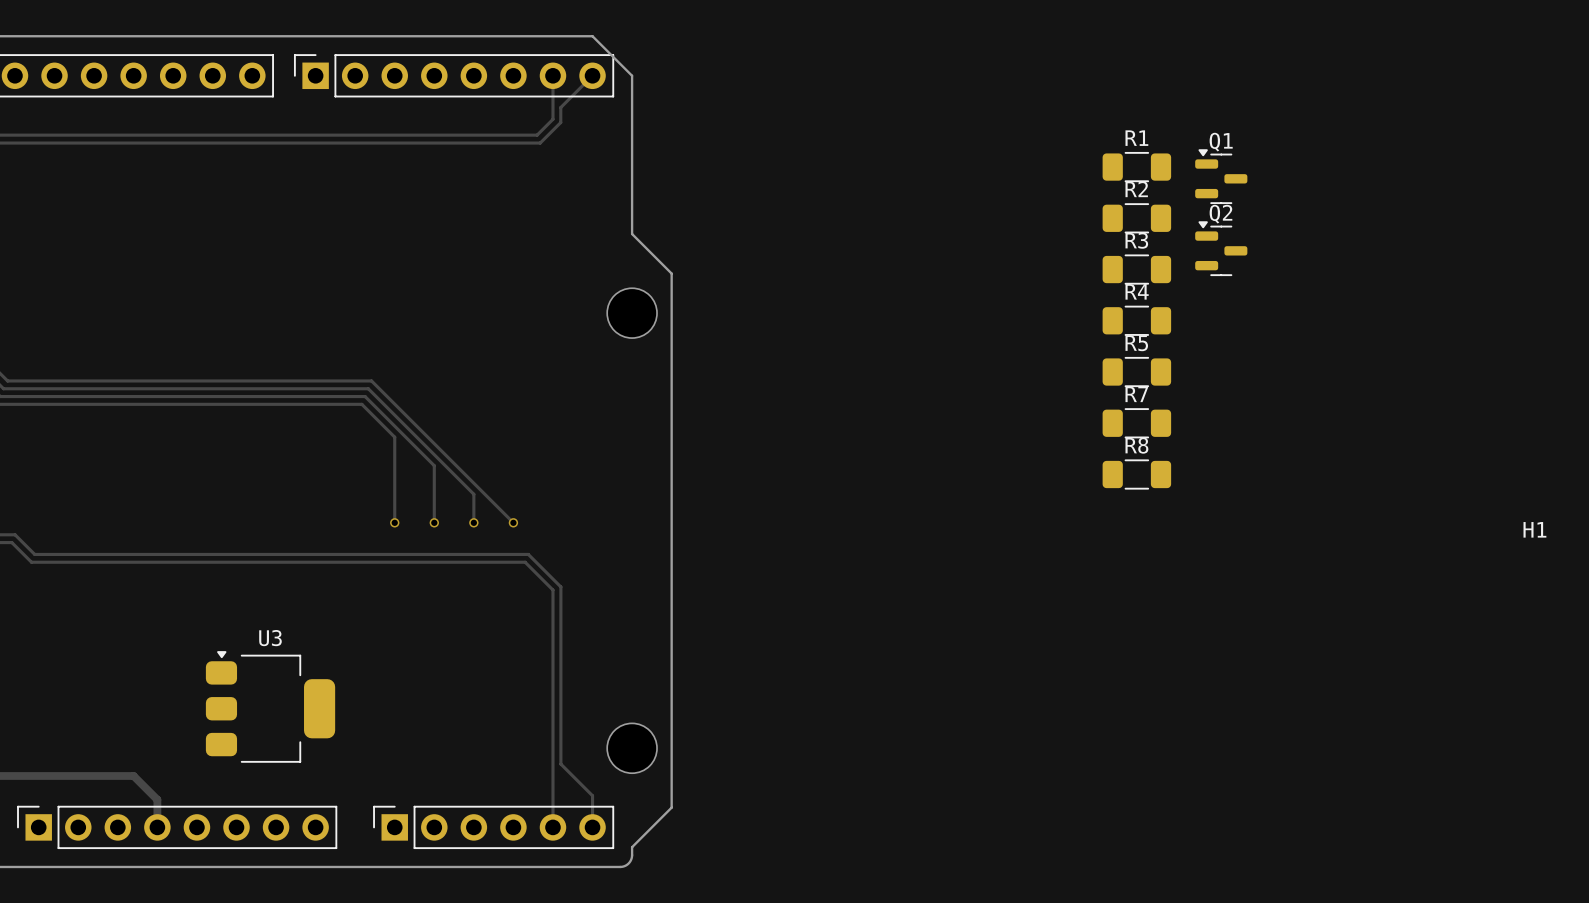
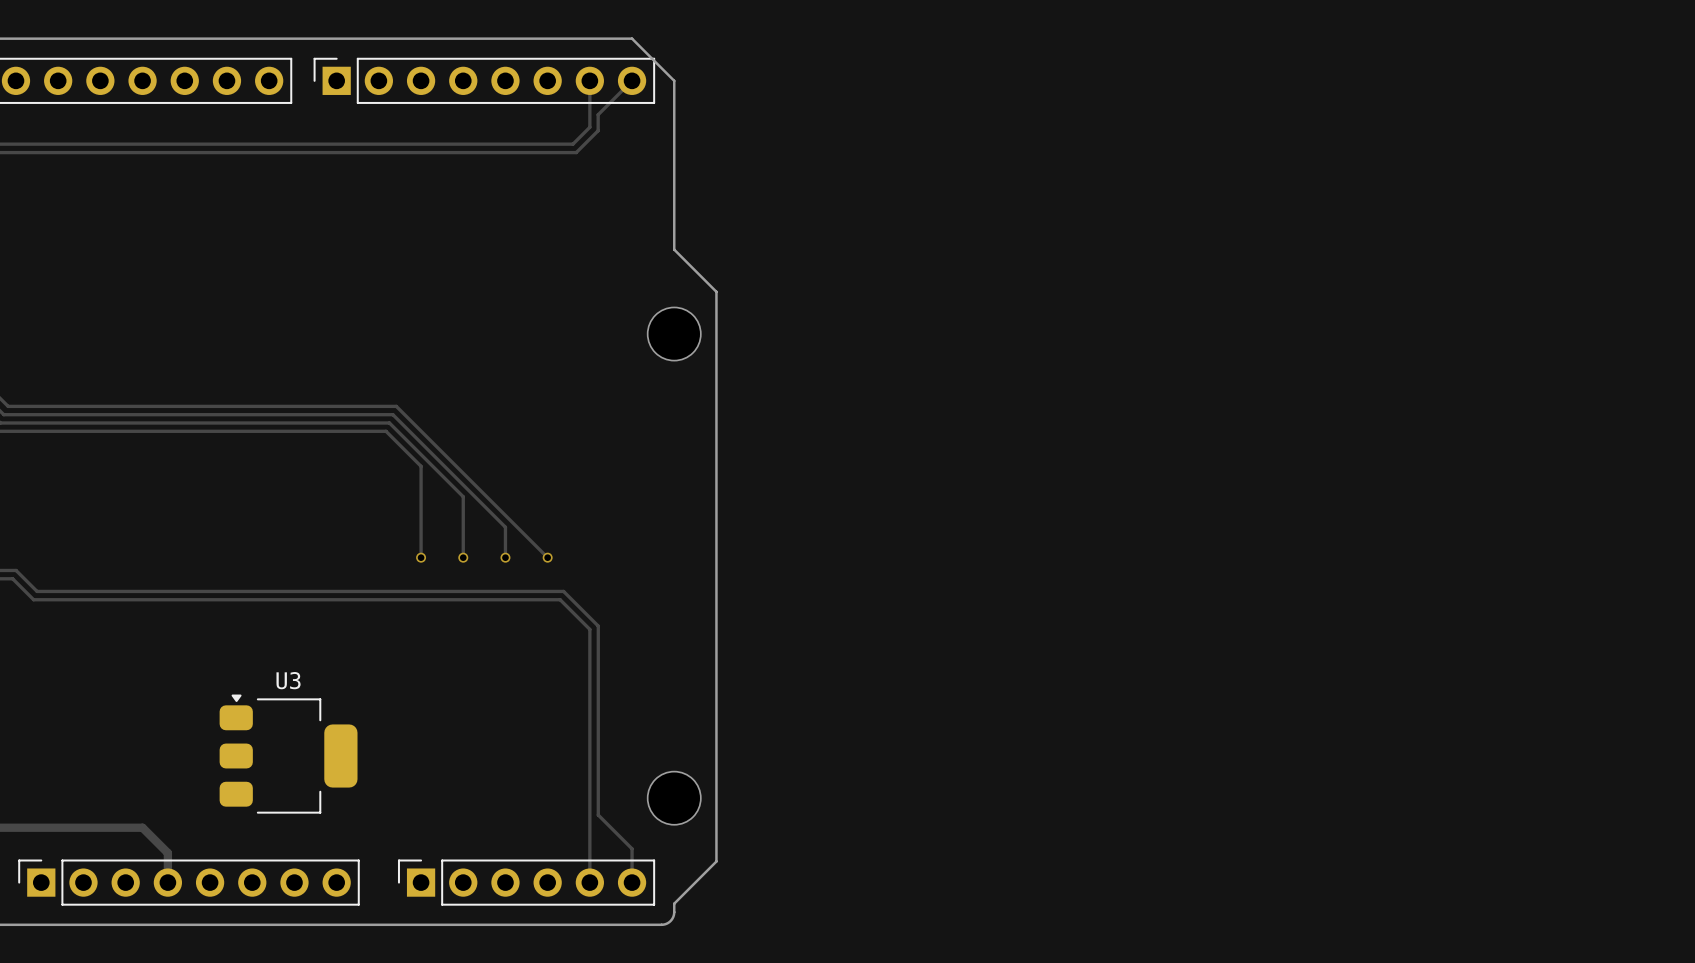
R1: (1136, 167) -> none
Q1: (1221, 176) -> none
R2: (1136, 218) -> none
Q2: (1221, 248) -> none
R3: (1136, 269) -> none
R4: (1136, 320) -> none
R5: (1136, 372) -> none
R7: (1136, 423) -> none
R8: (1136, 474) -> none
H1: (1534, 529) -> none

